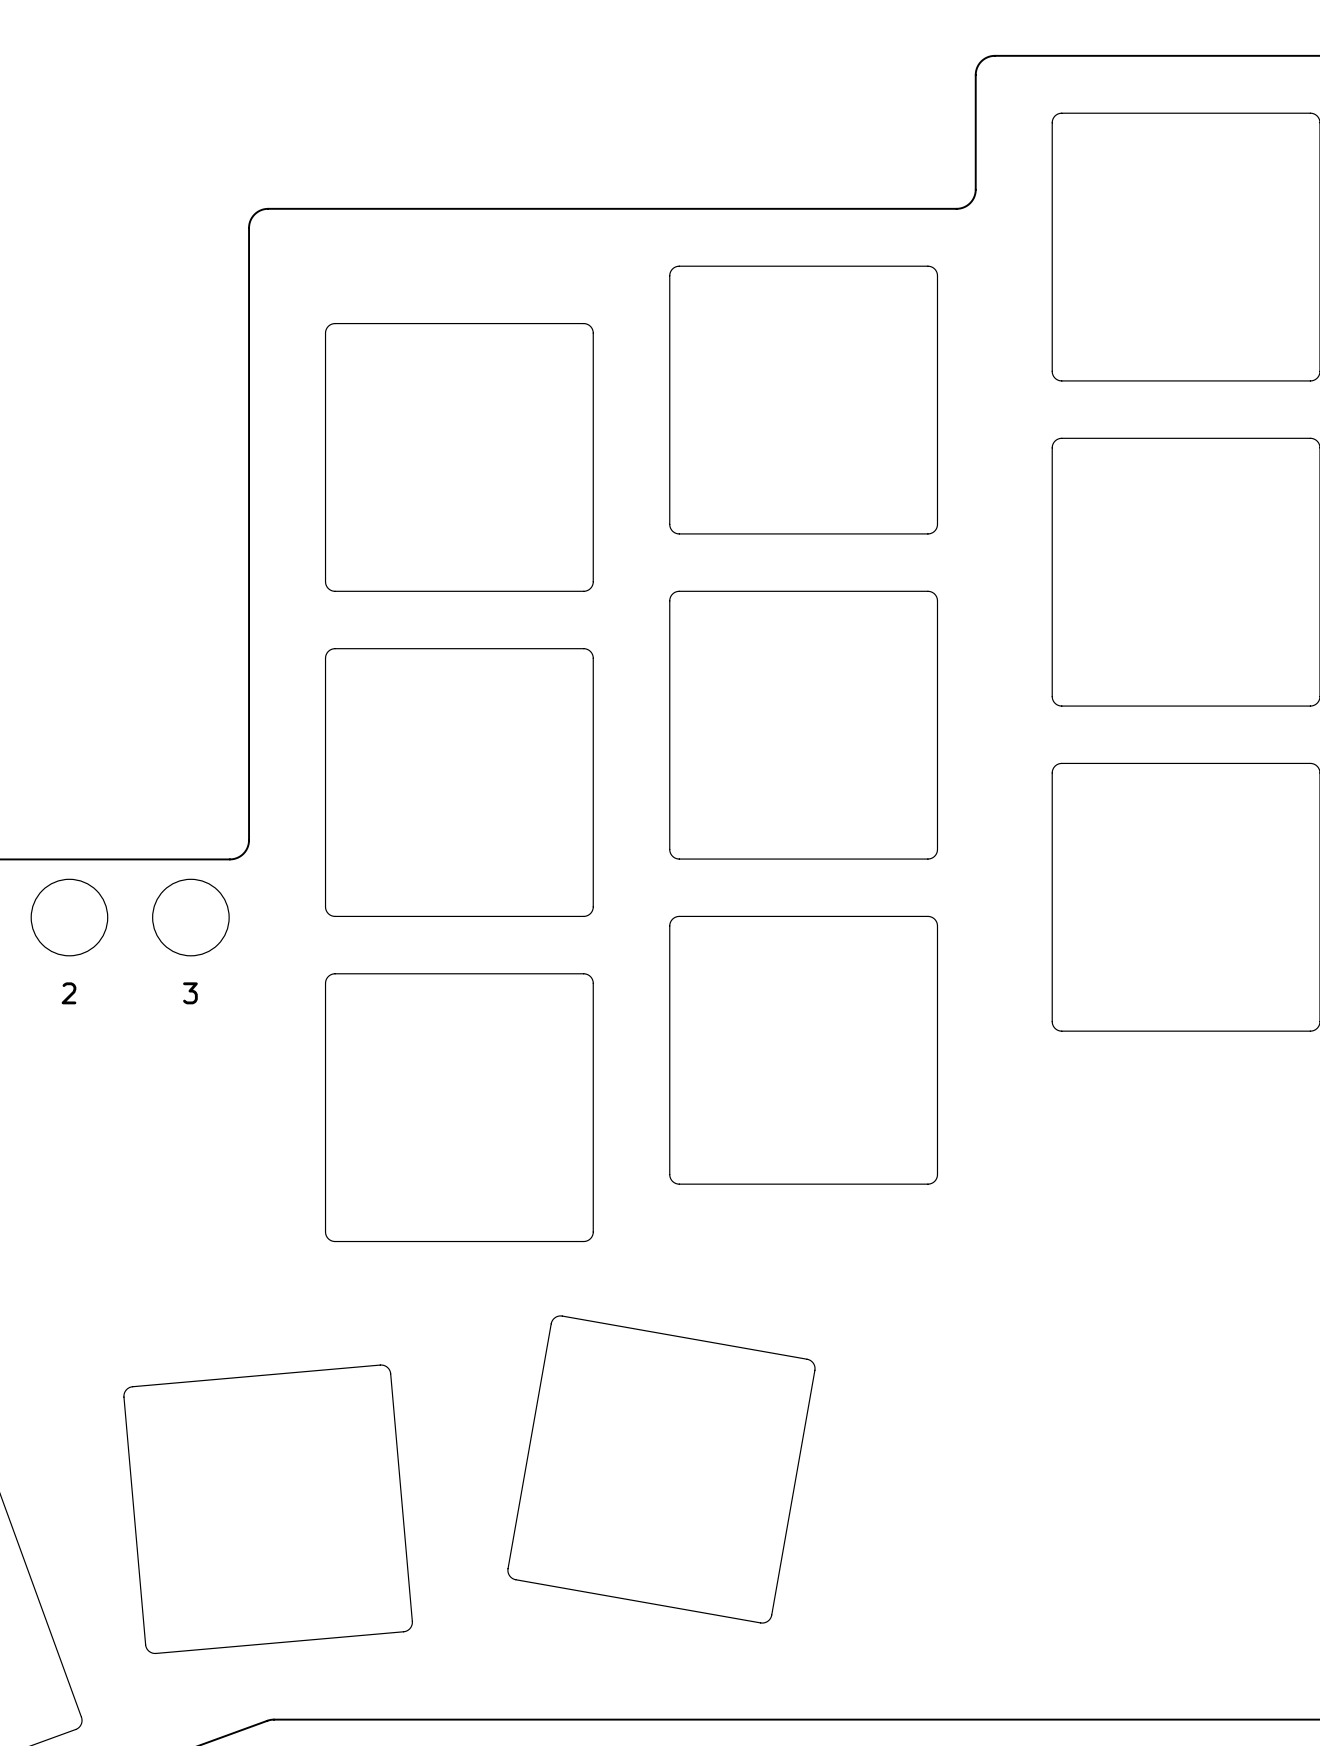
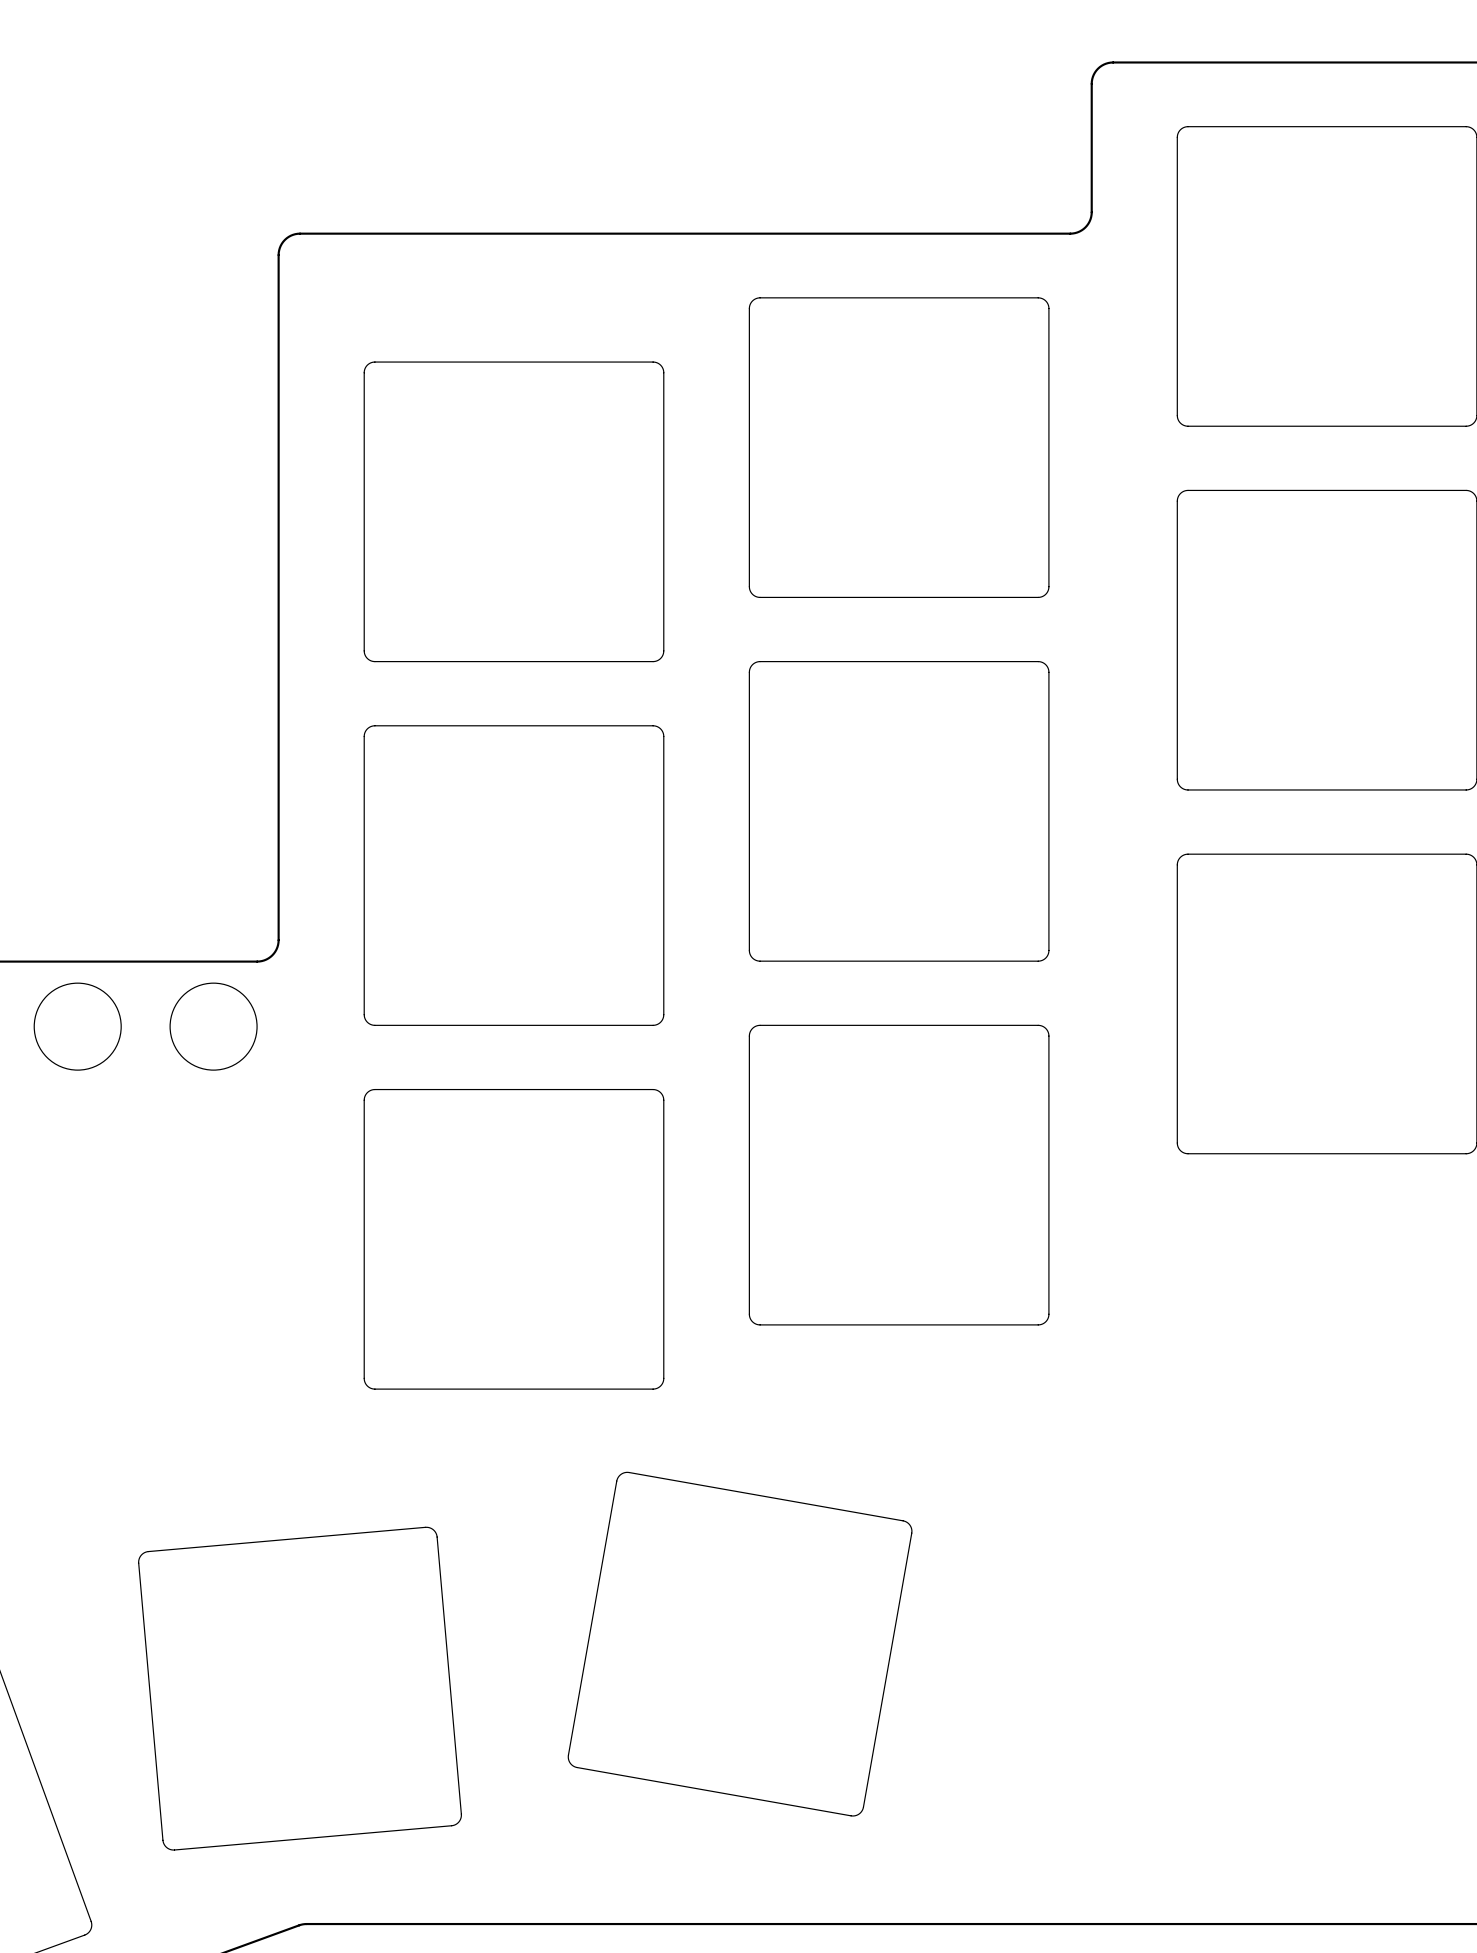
drawing shape: [30, 878, 109, 1005] -> [33, 982, 122, 1071]
drawing shape: [152, 878, 230, 1005] -> [169, 982, 258, 1071]

